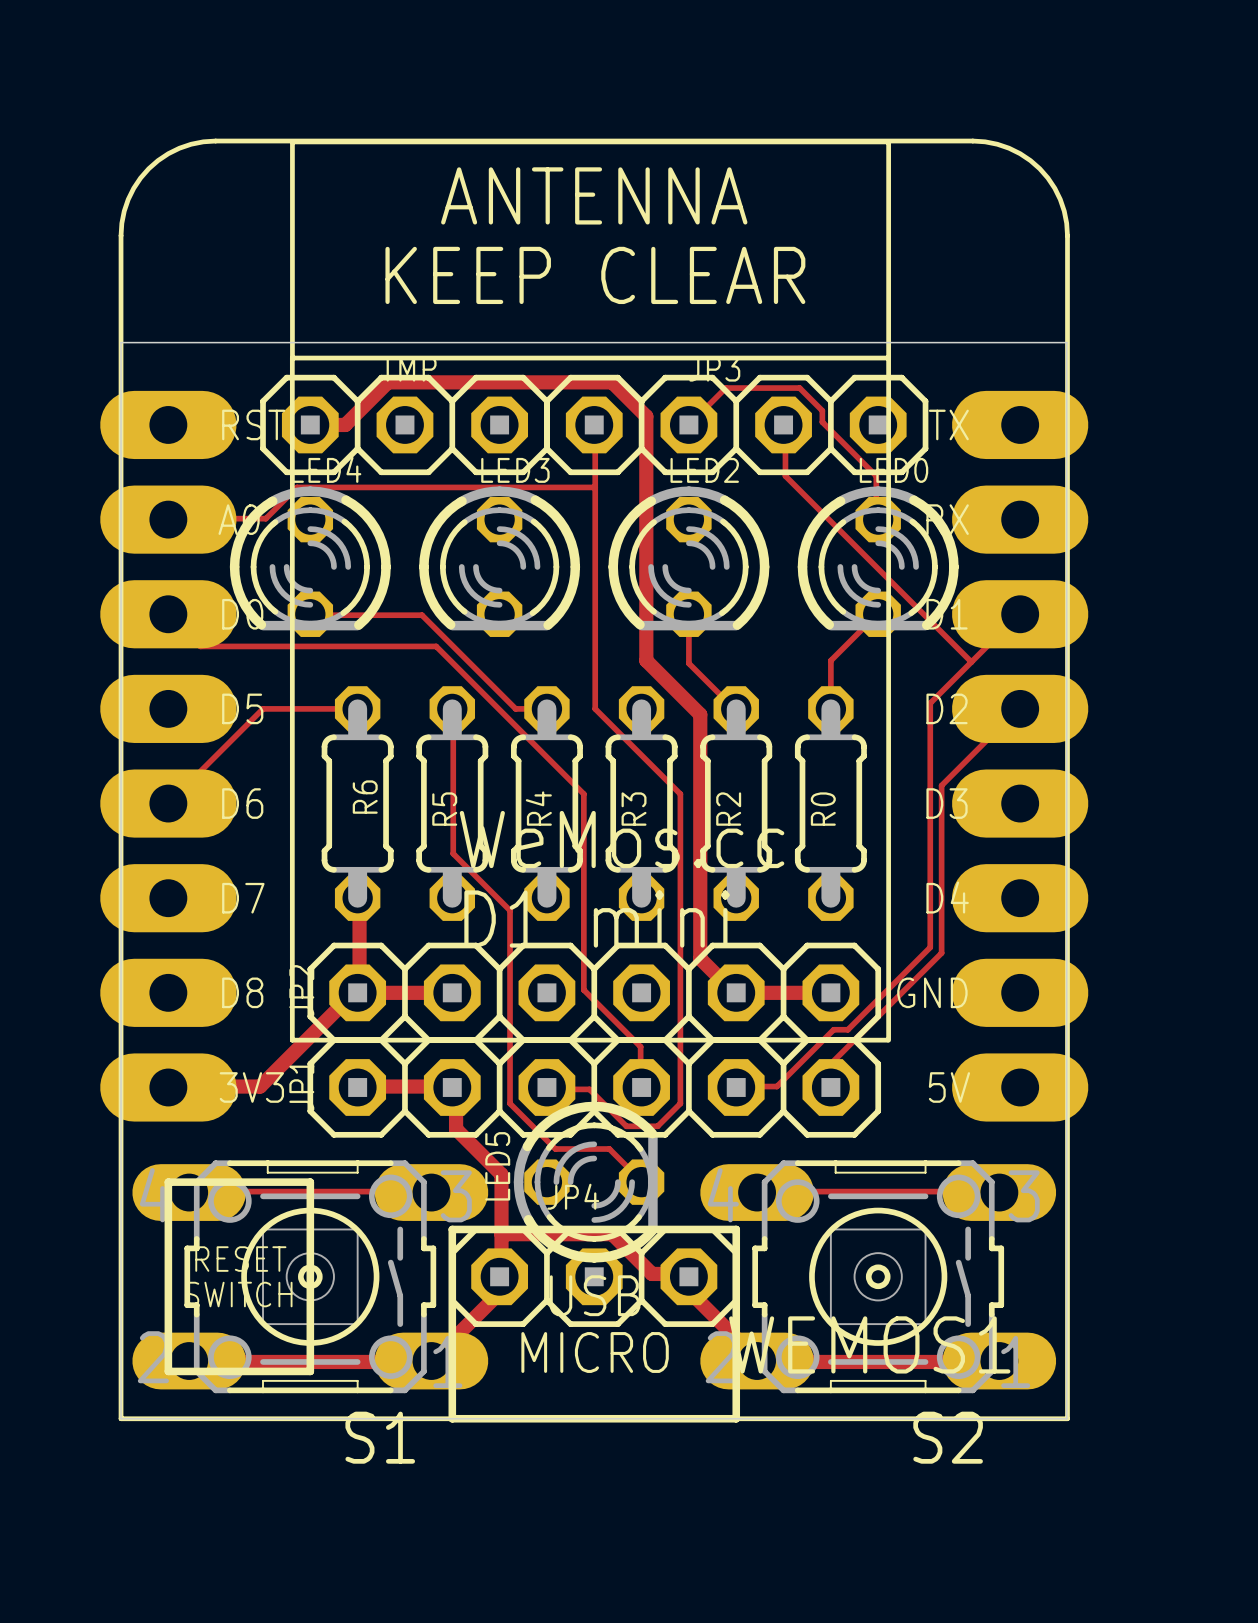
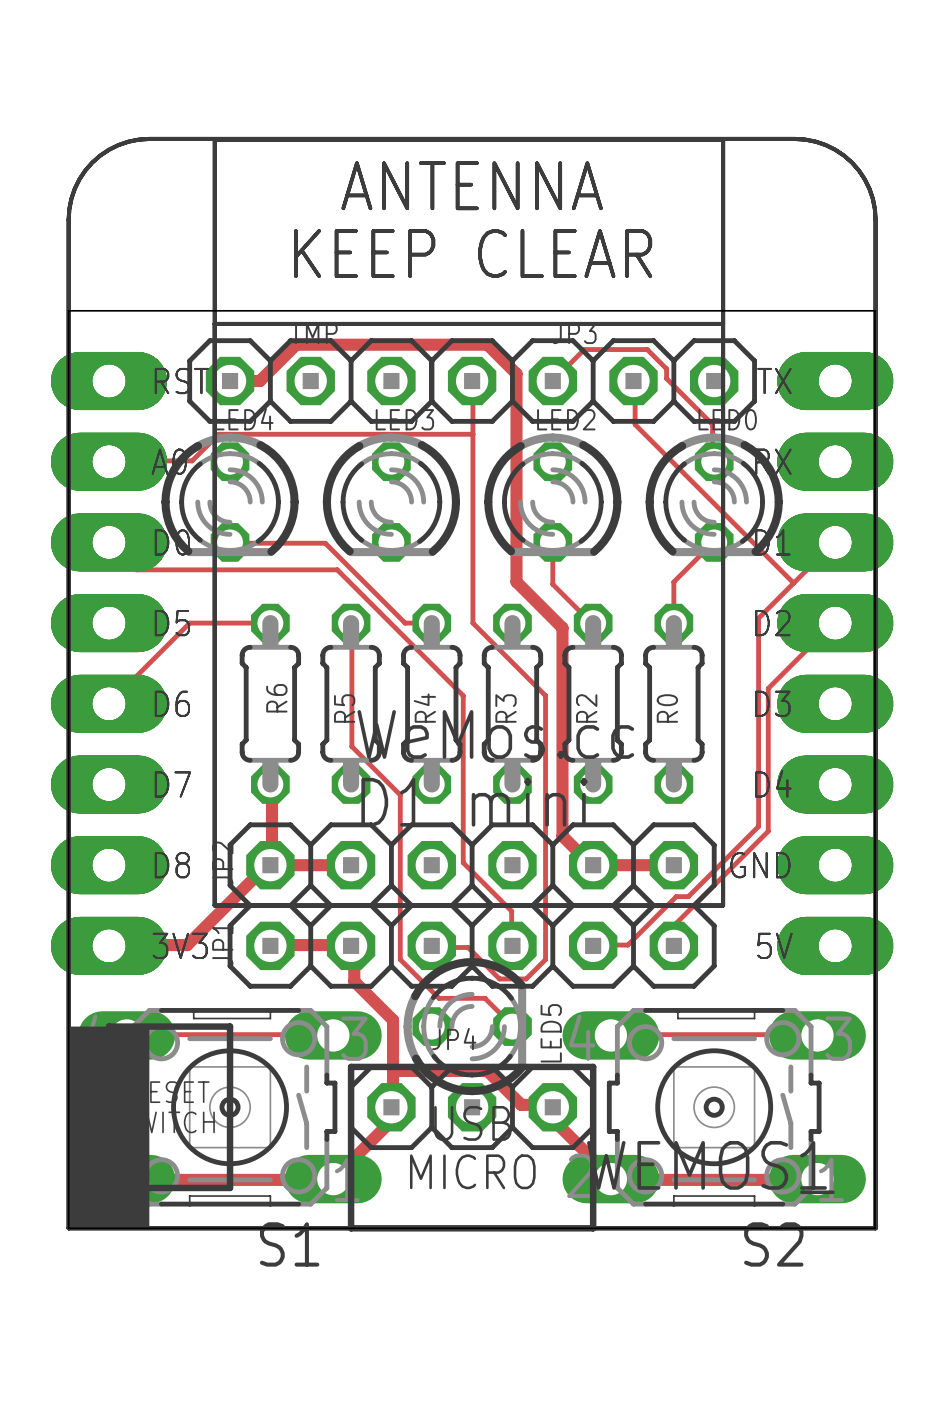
part: none -> (472, 683)
LED5 name position: LED5 (497, 1166) -> LED5 (551, 1033)

